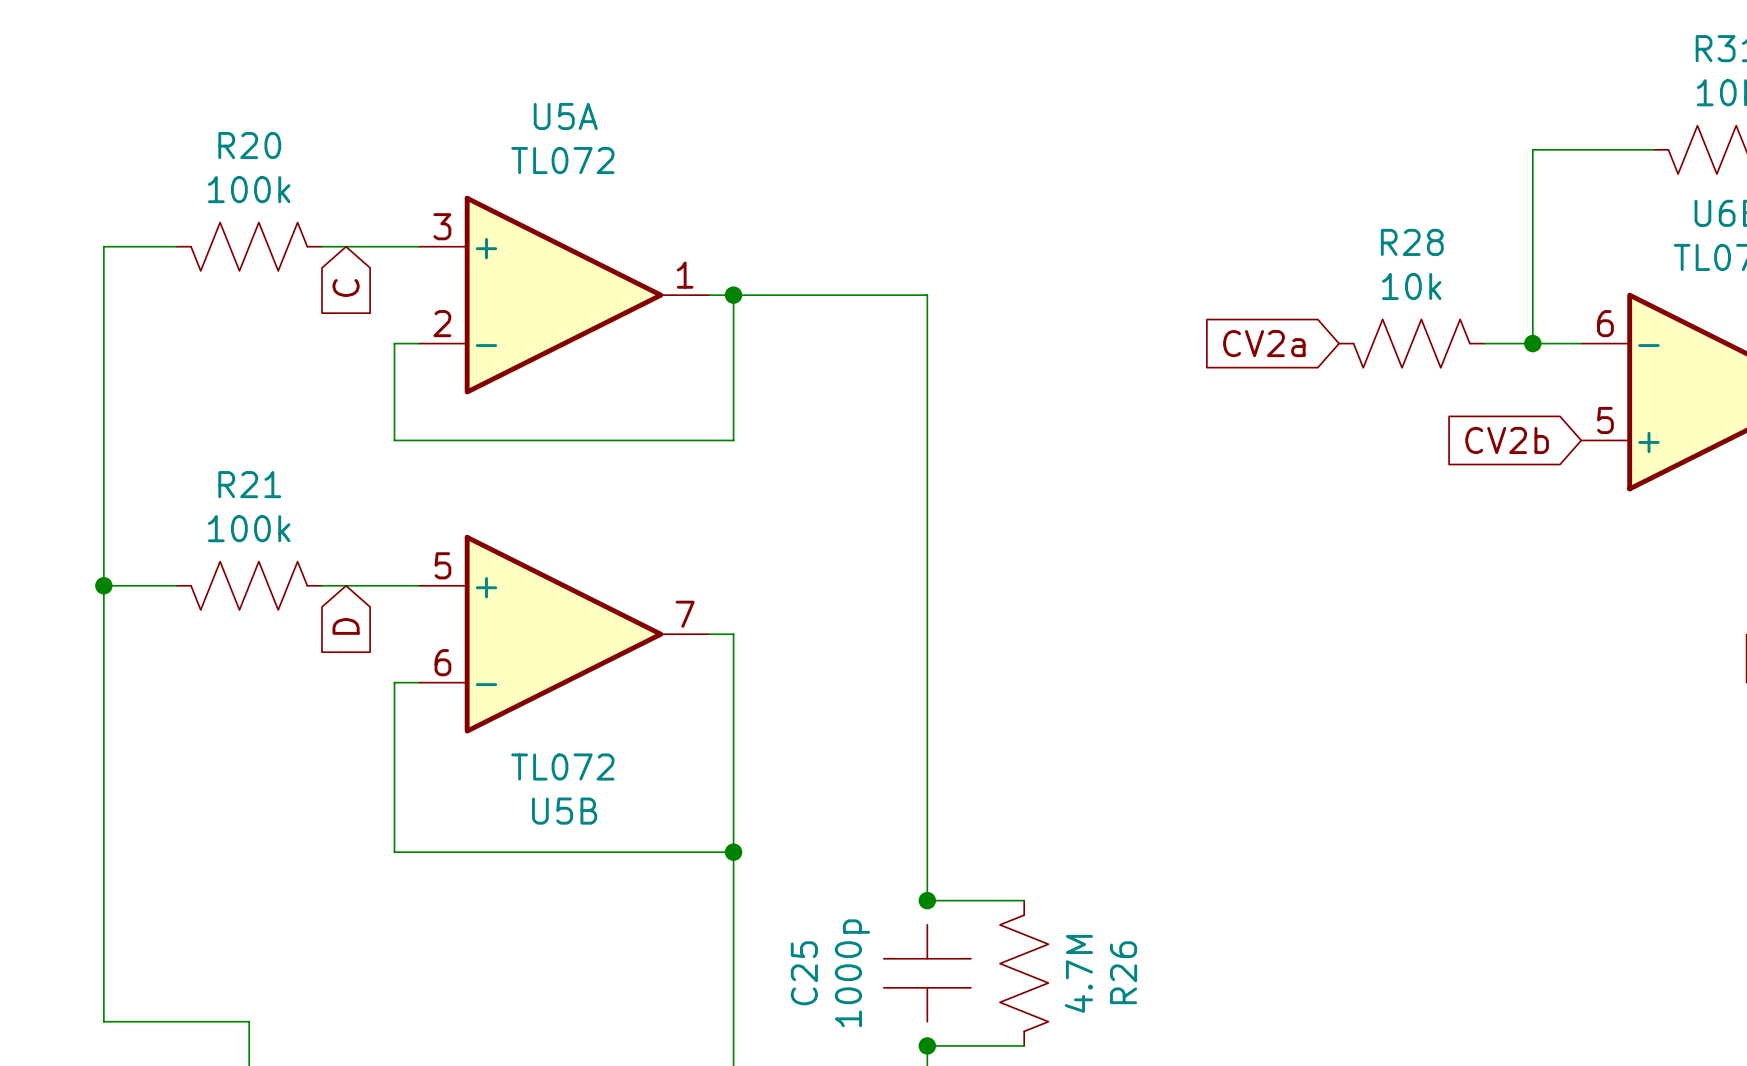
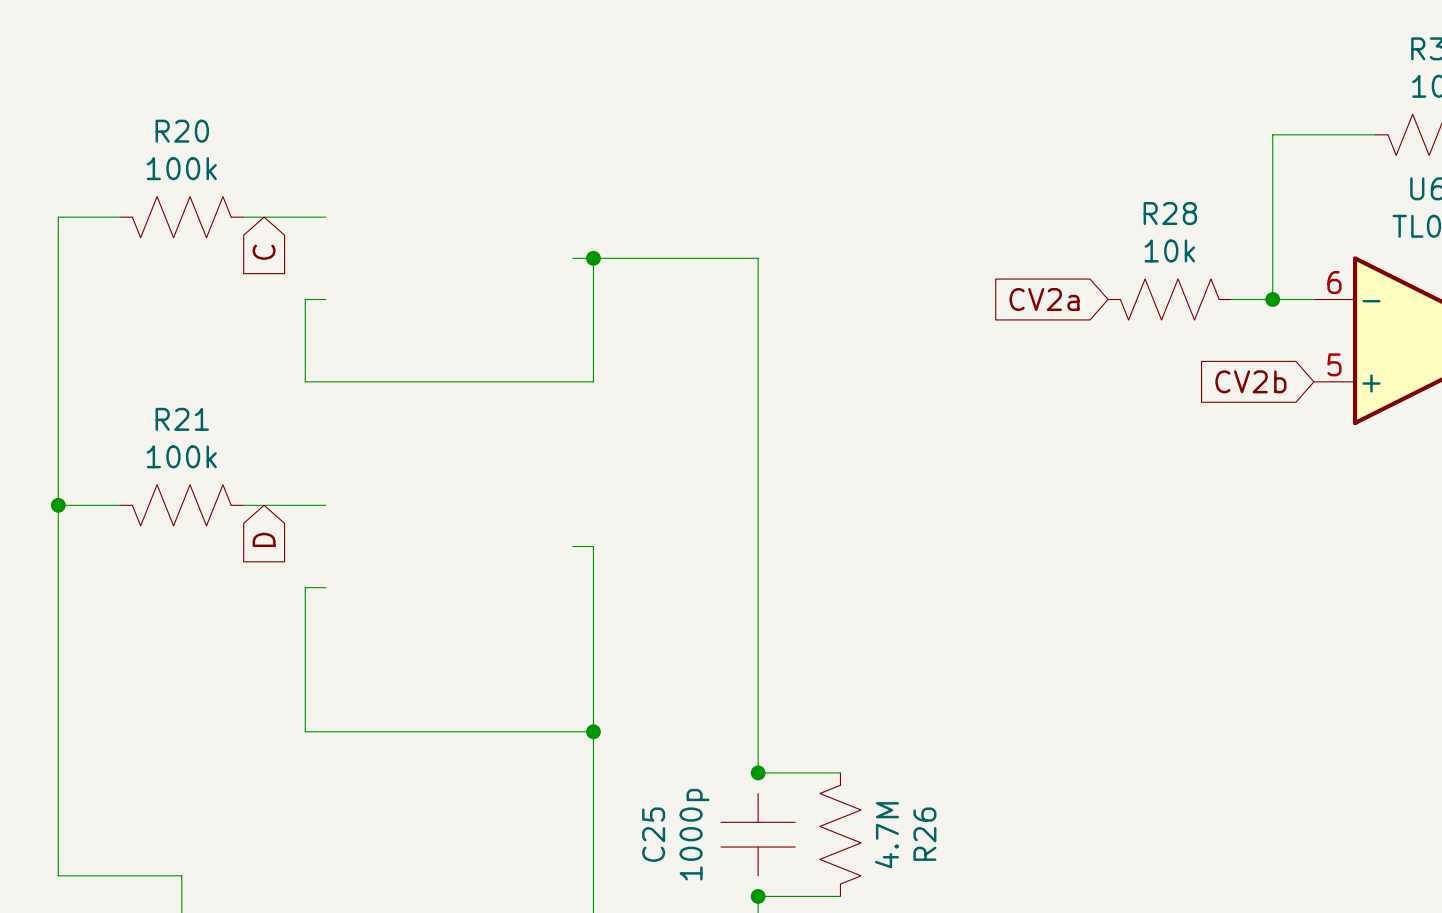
U5A: TL072 (564, 295) -> none
U5B: TL072 (564, 634) -> none

